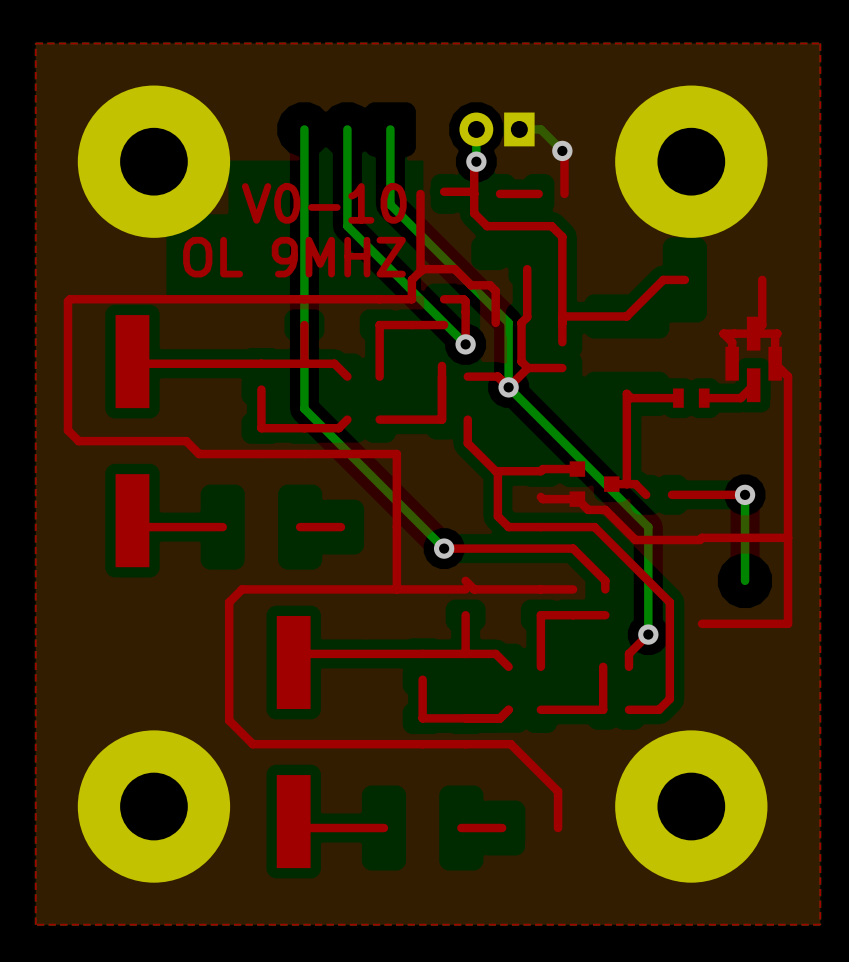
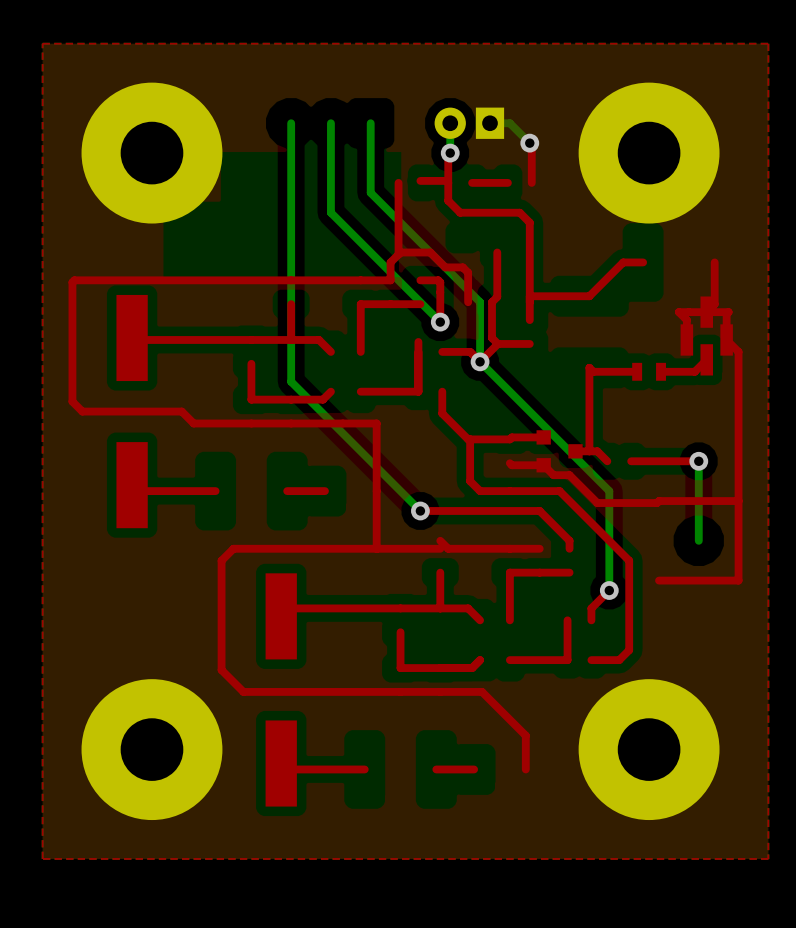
text: V0-10 (324, 203) -> none
text: OL 9MHZ (294, 257) -> none

